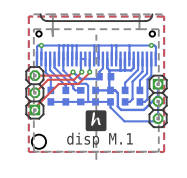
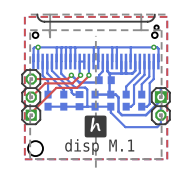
hole: none -> (156, 27)
part footprint: [148, 75, 168, 128] -> [151, 87, 171, 125]

